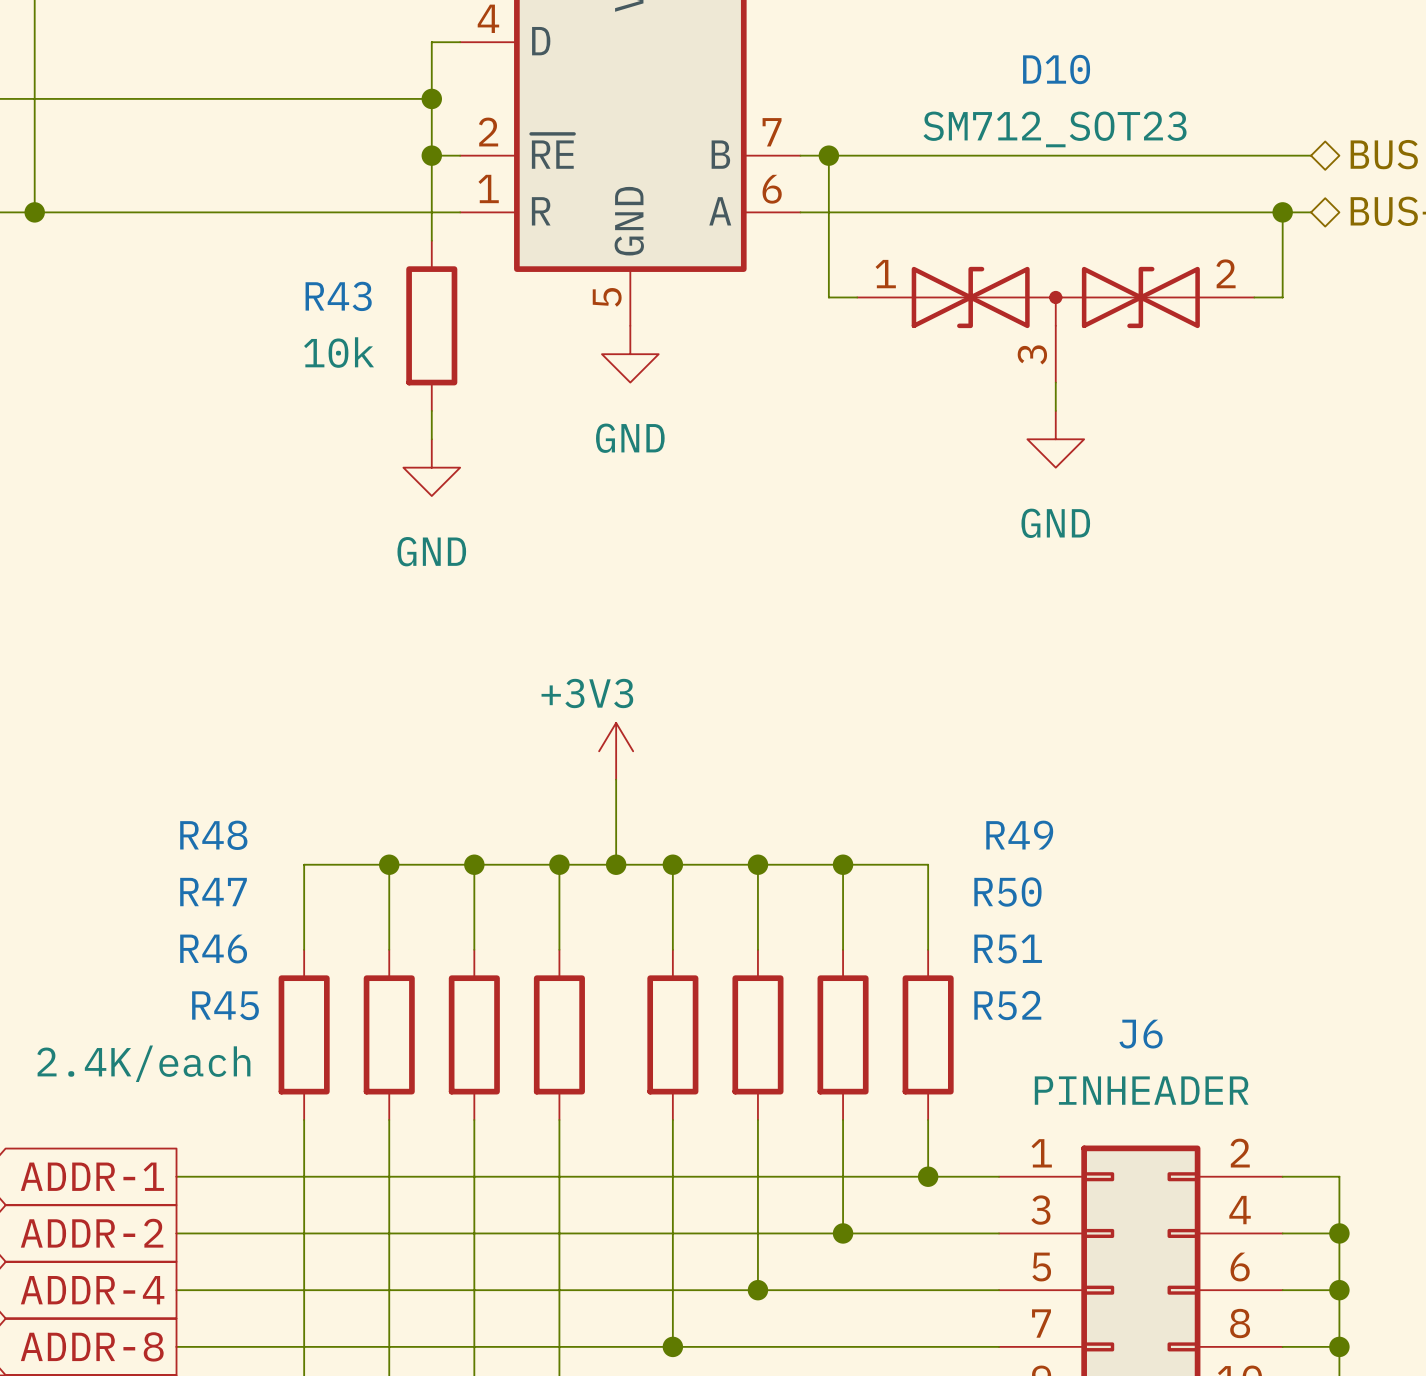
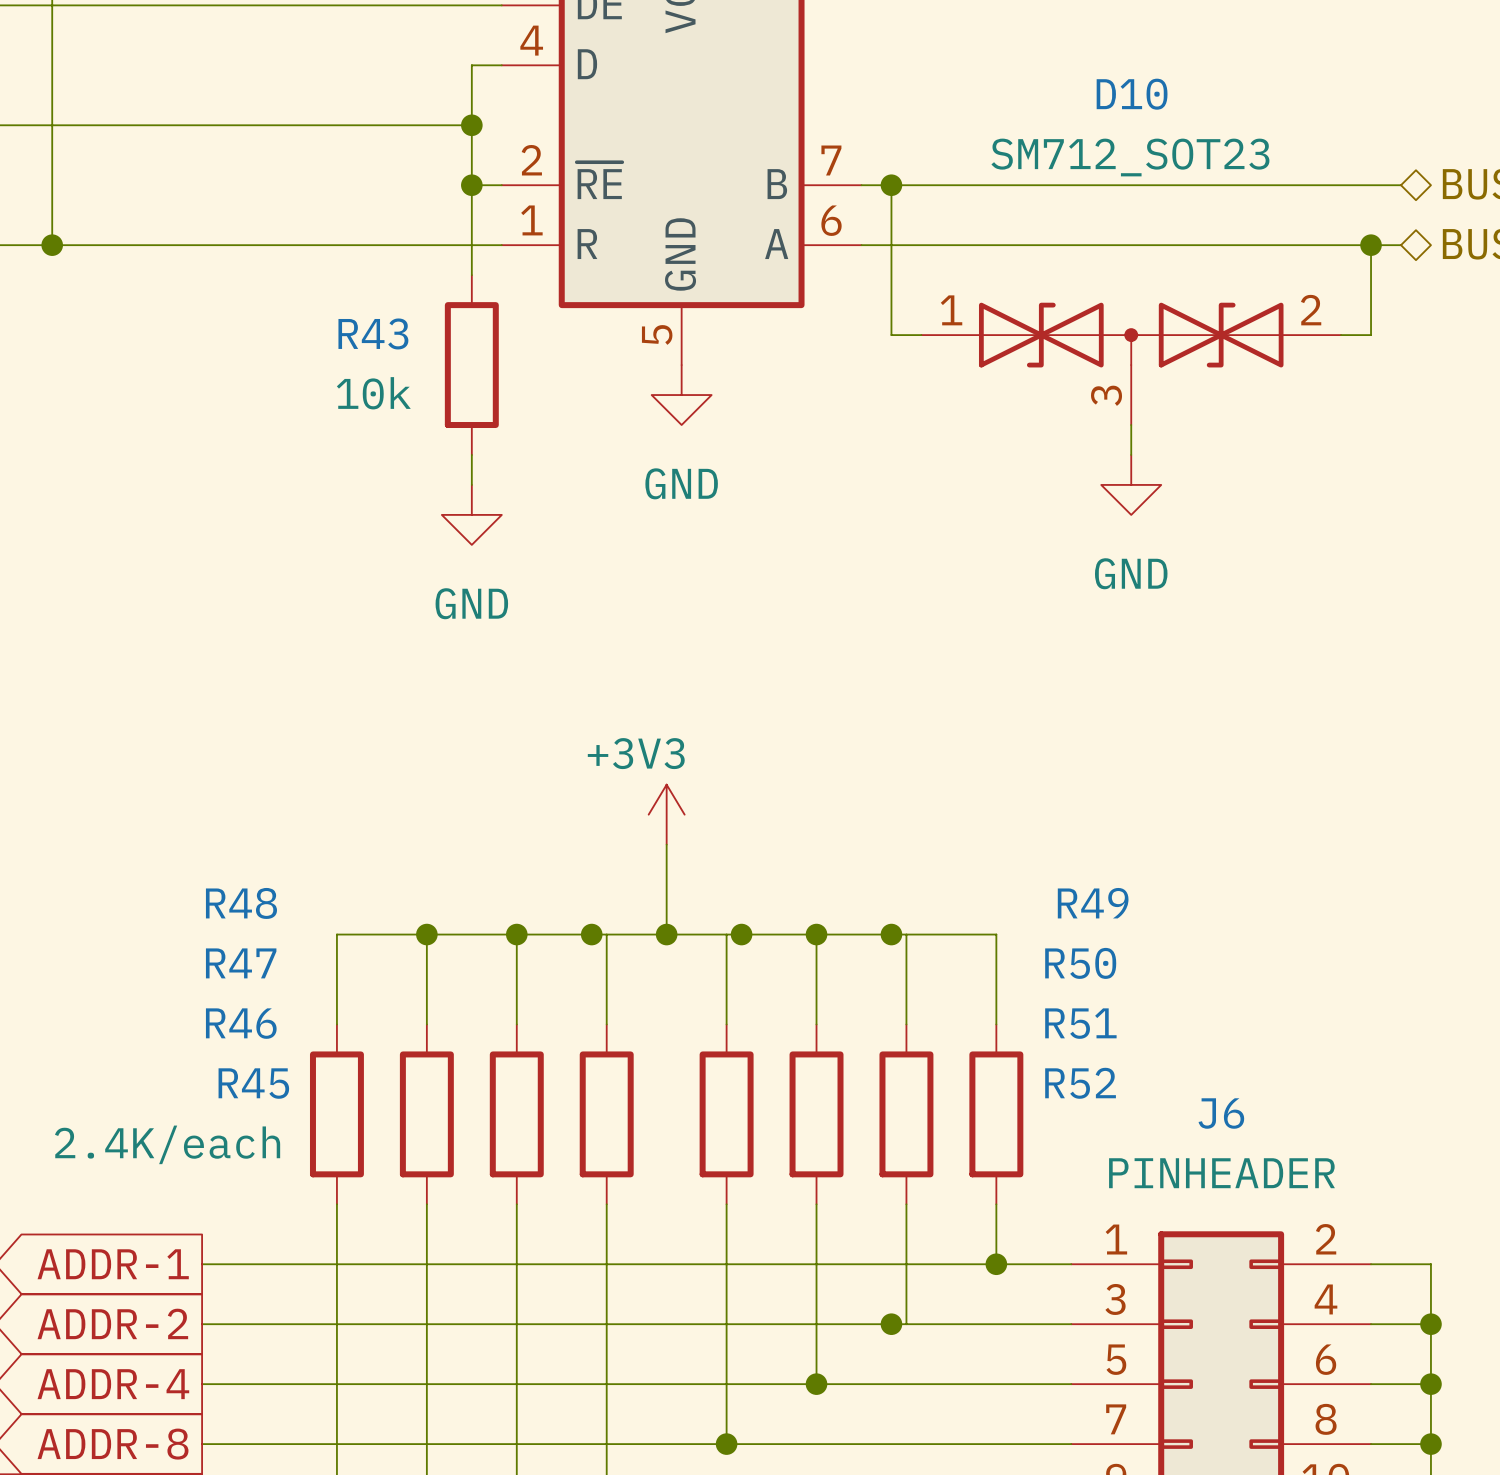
junction position: (559, 864) -> (591, 934)
junction position: (672, 864) -> (741, 934)
junction position: (843, 864) -> (891, 934)
junction position: (843, 1233) -> (891, 1324)

